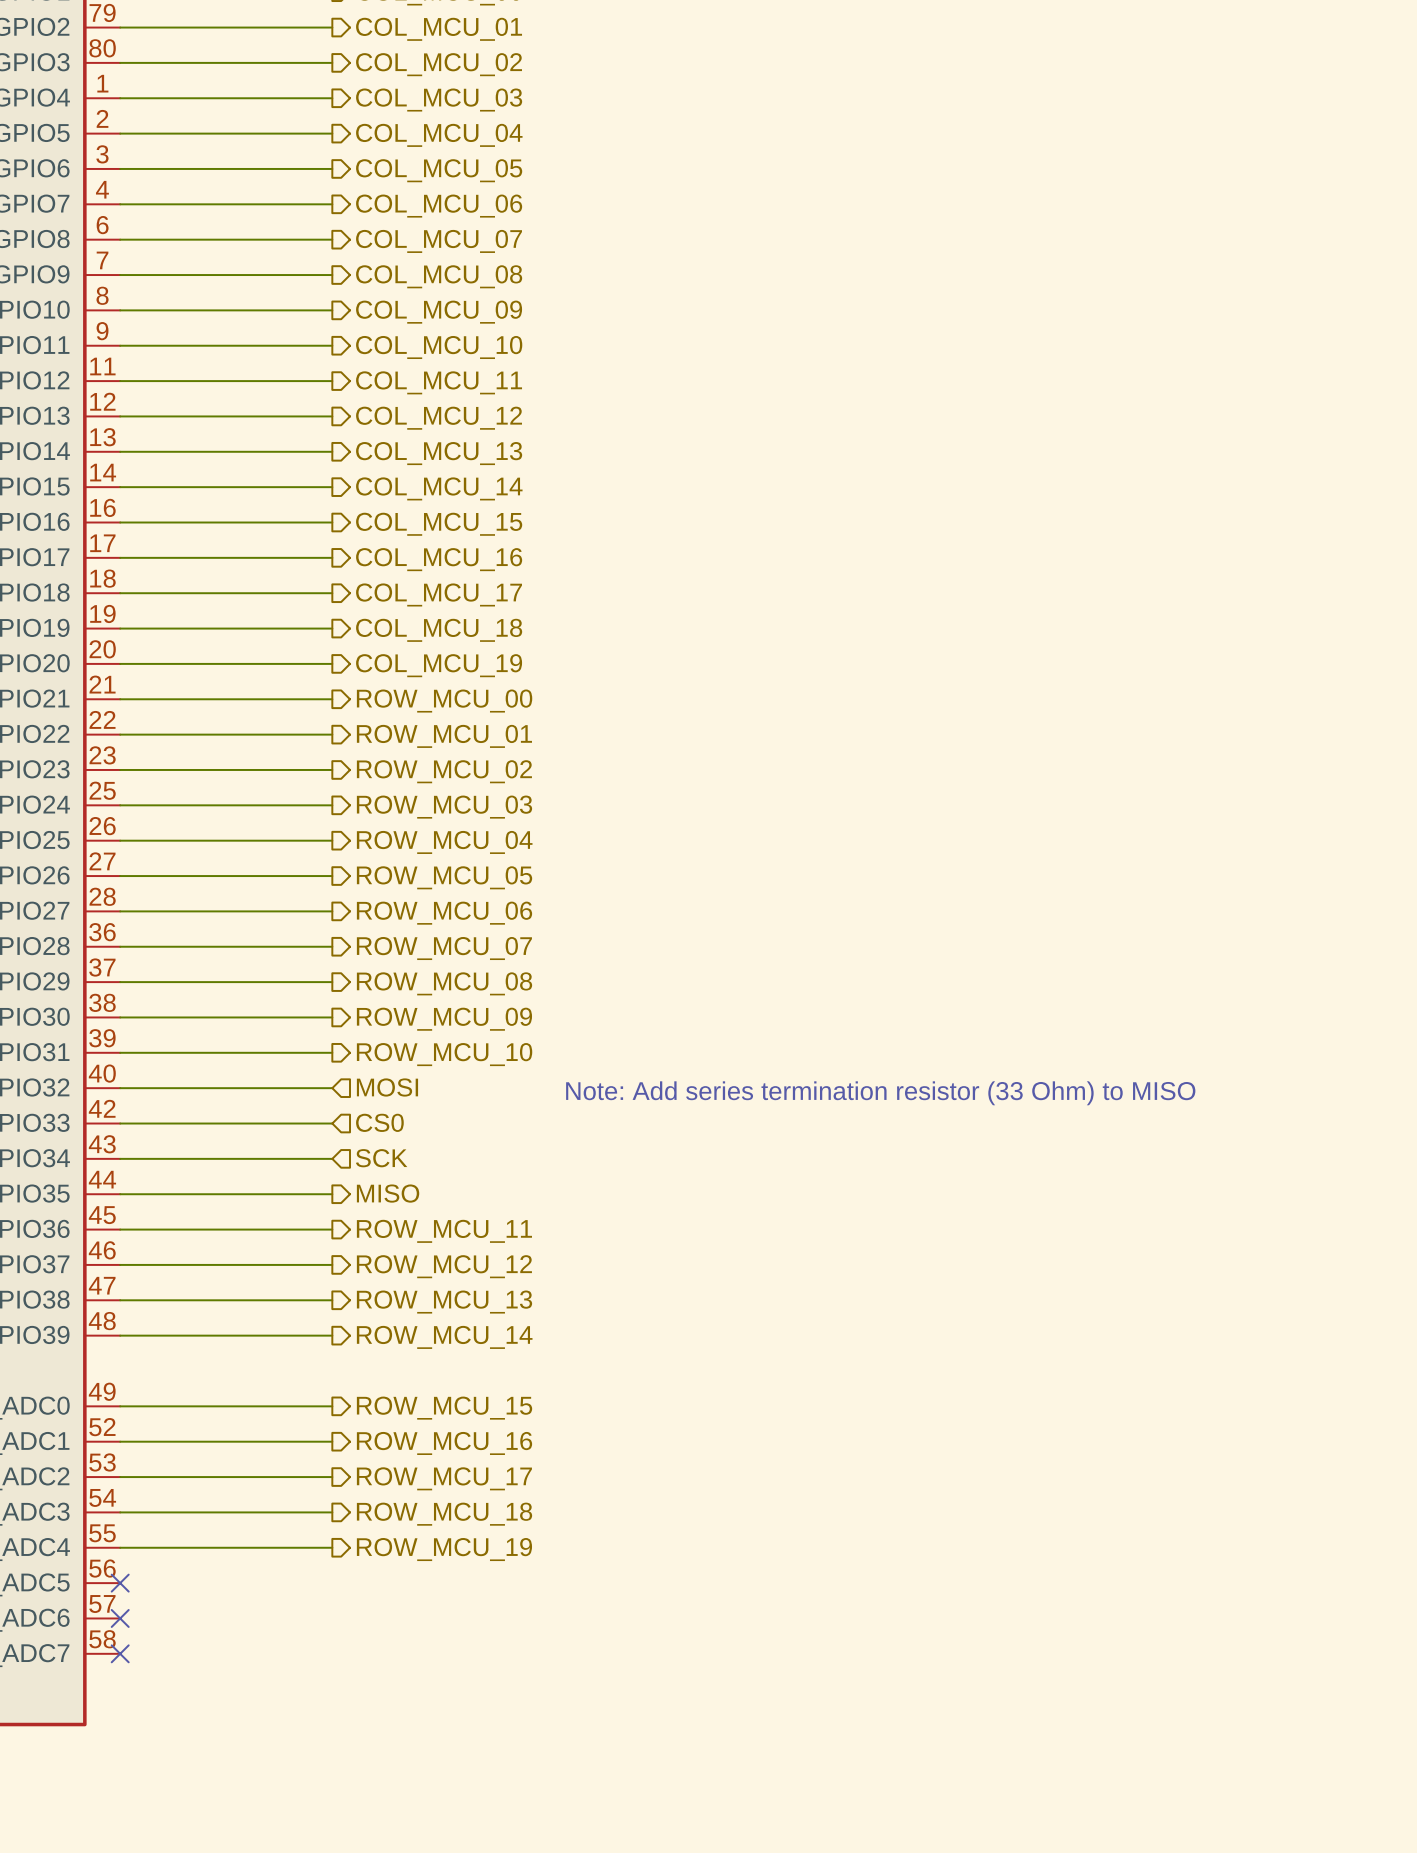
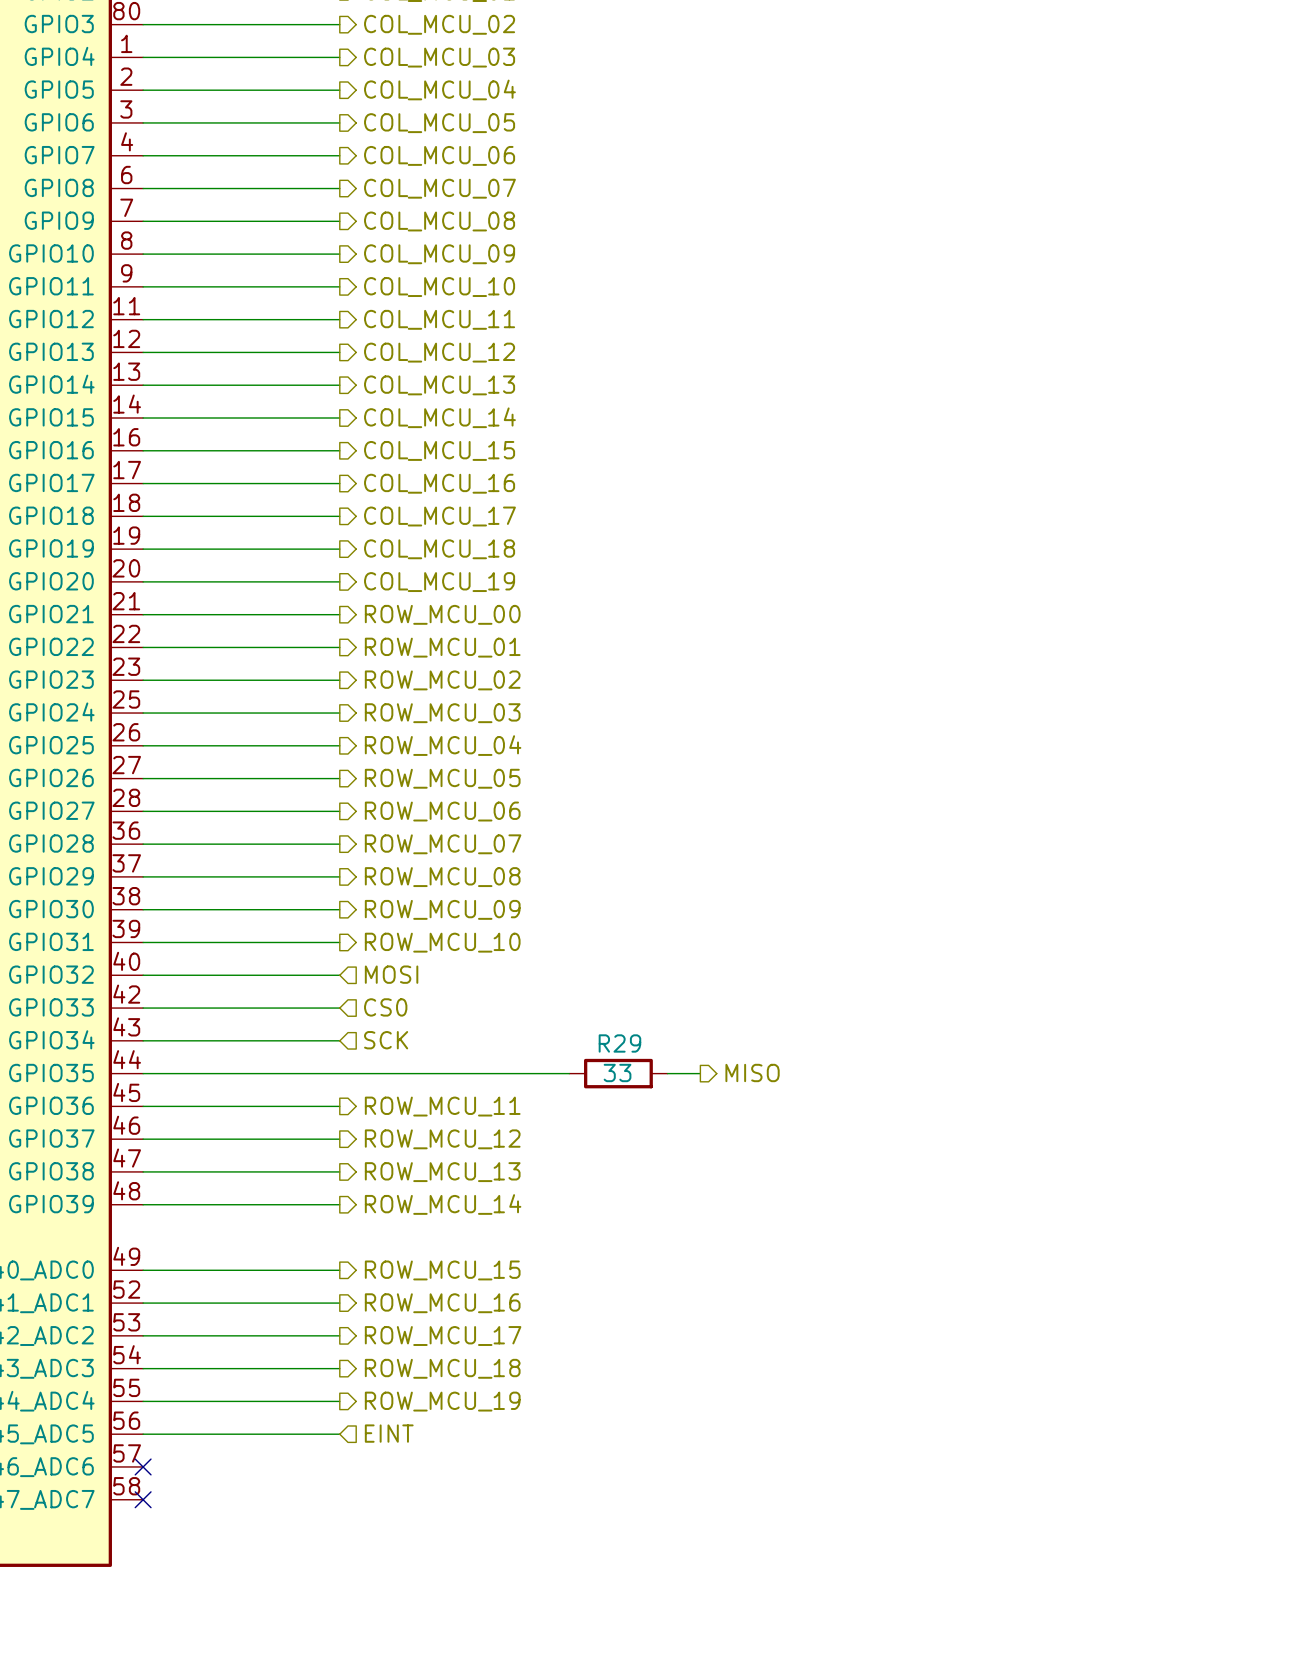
text: Note: Add series termination resistor (33 Ohm) to MISO (880, 1093) -> none
hierarchical label: MISO (388, 1193) -> none
hierarchical label: none -> MISO (752, 1072)
wire: none -> (339, 1073) (569, 1073)
R29: none -> 33 (618, 1073)
wire: none -> (667, 1073) (700, 1073)
hierarchical label: none -> EINT (389, 1433)
wire: none -> (143, 1434) (339, 1434)
no-connect mark: (120, 1583) -> none

